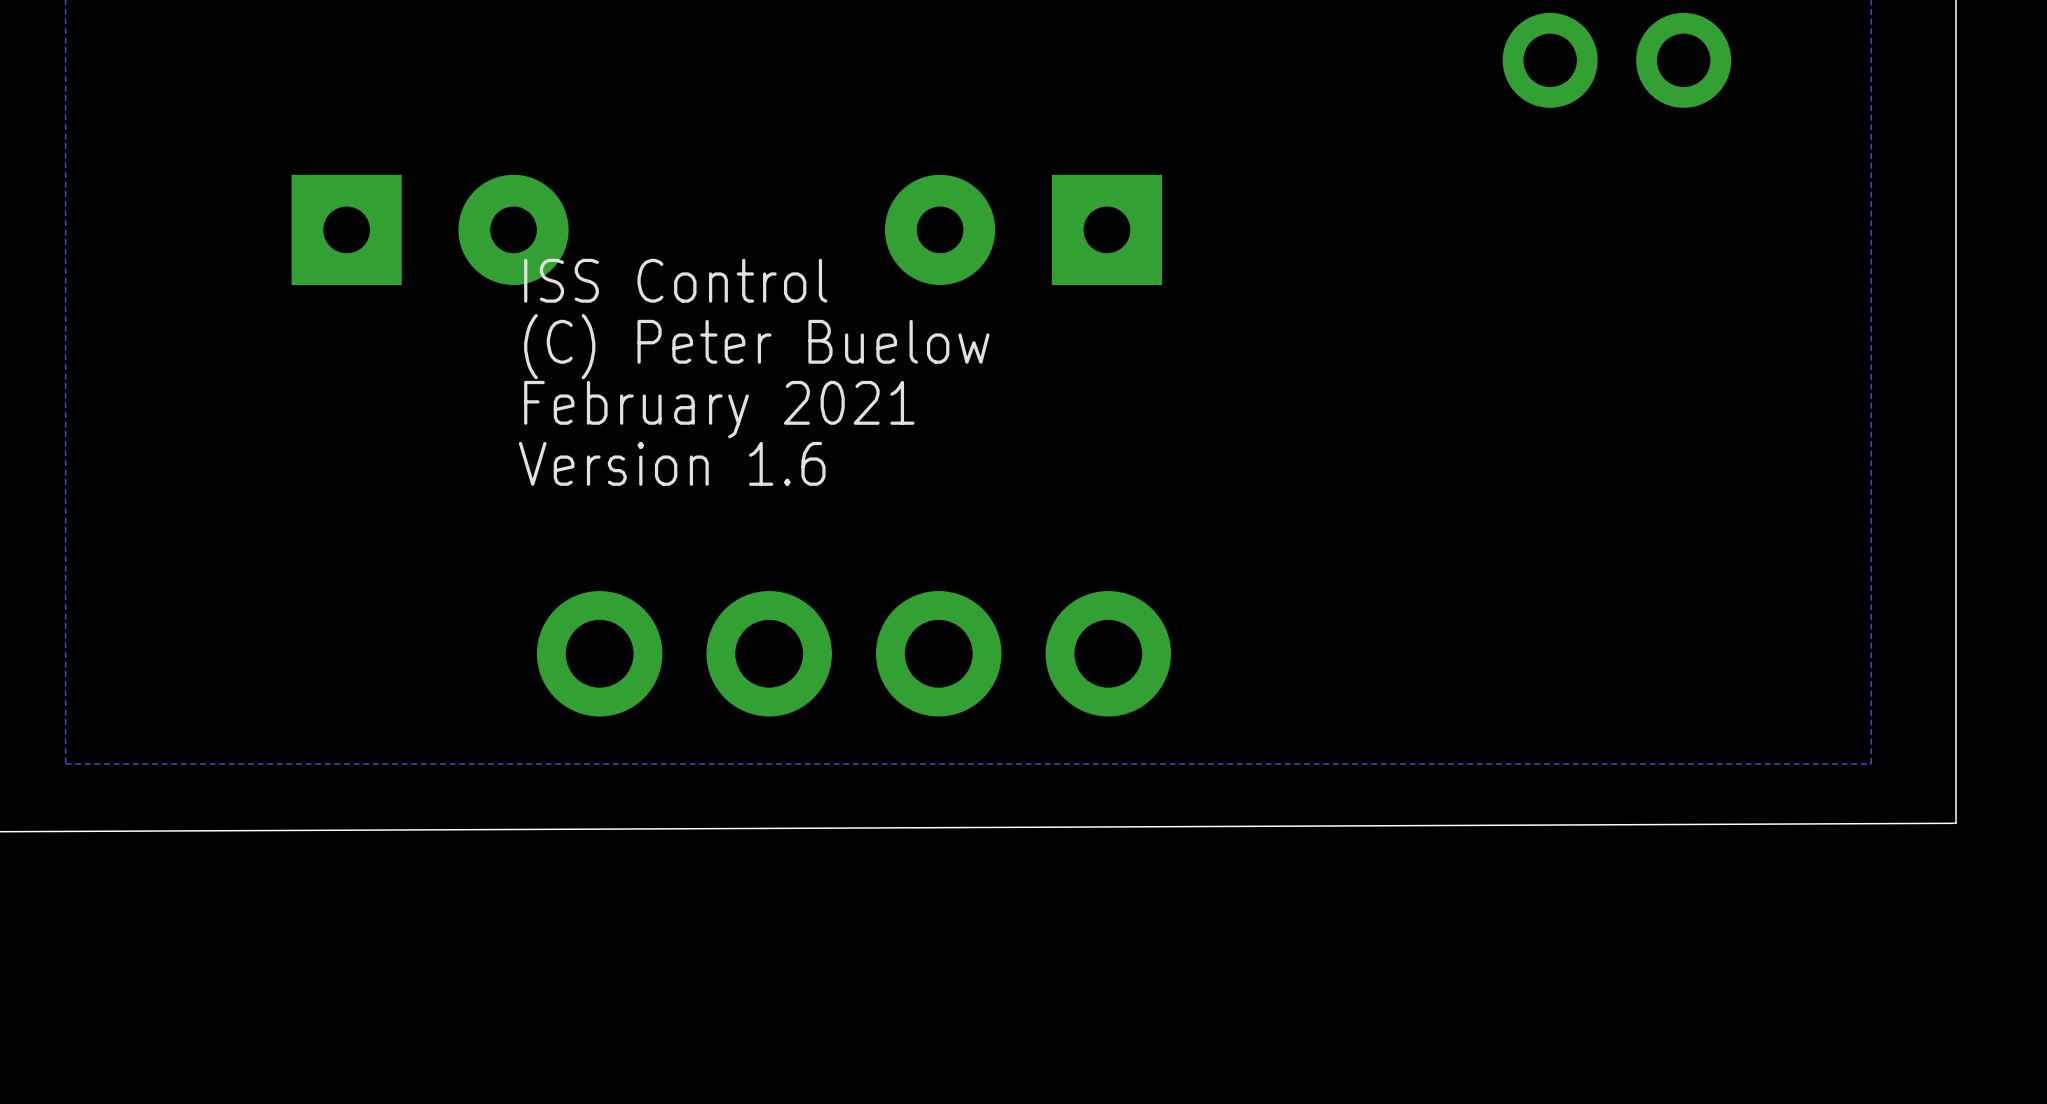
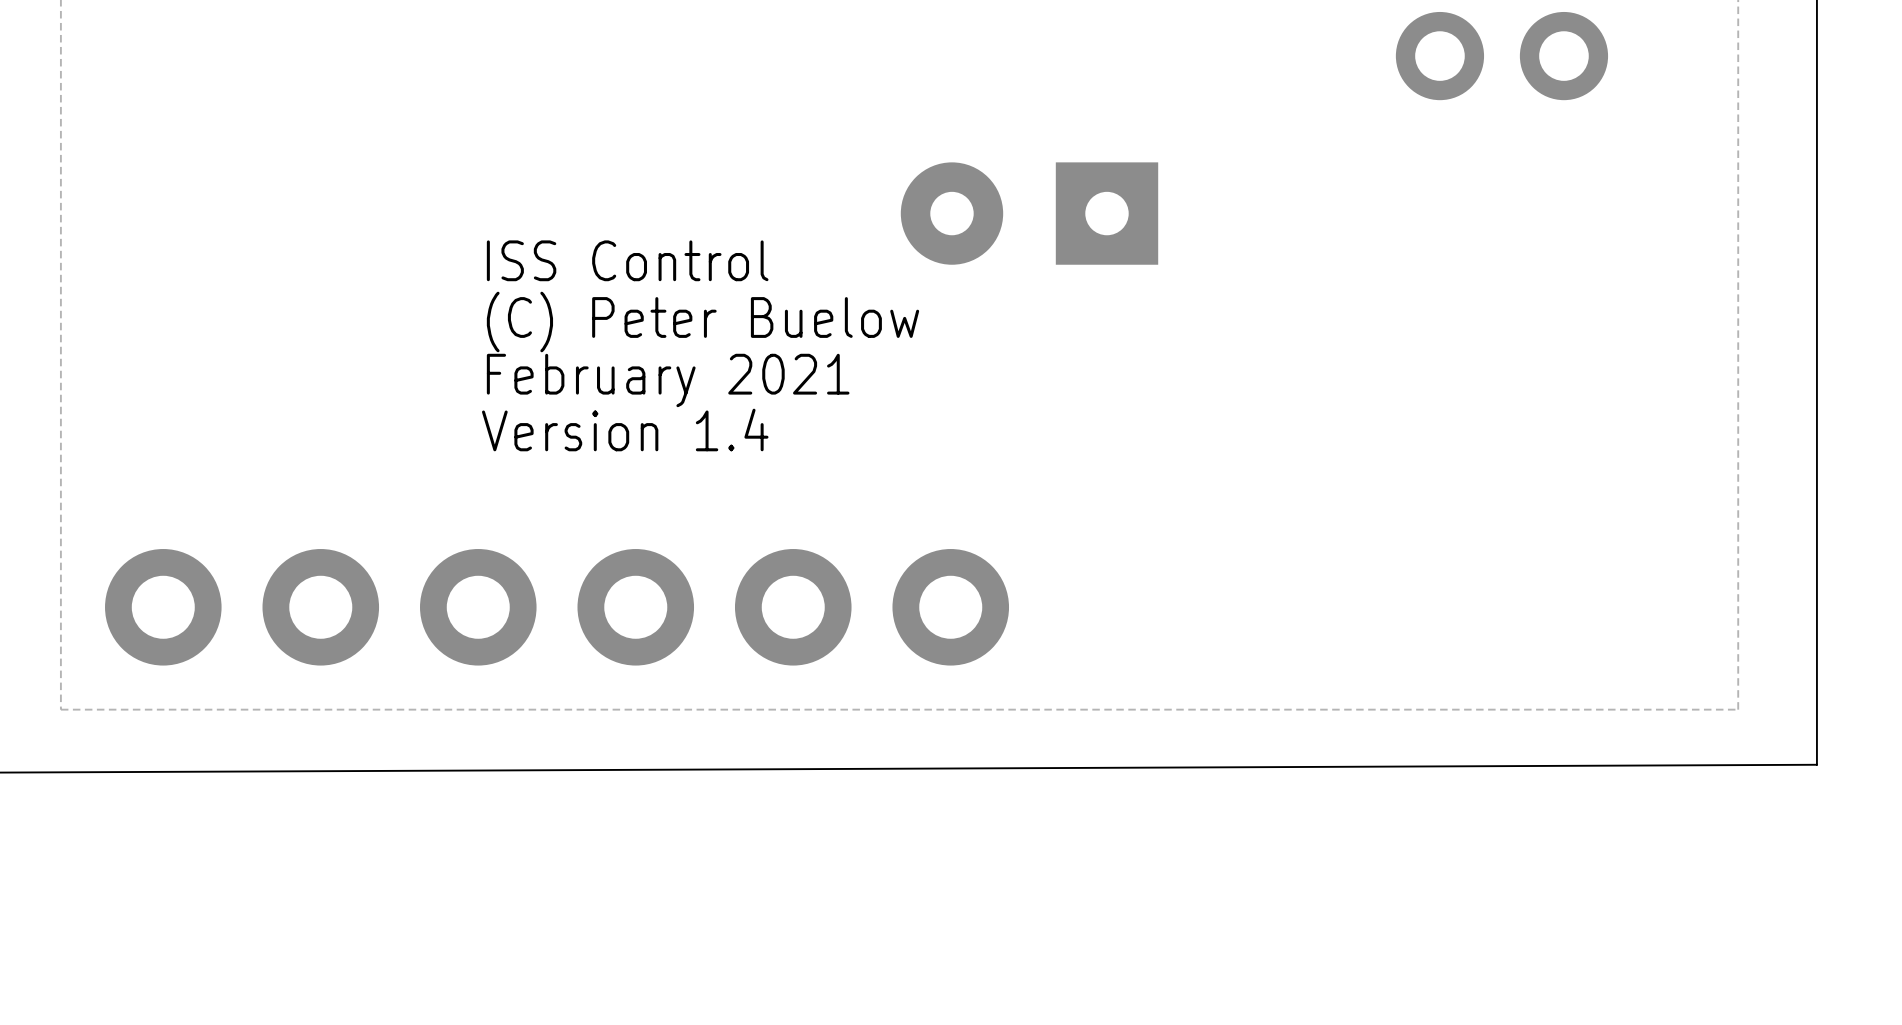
part: (430, 229) -> none
part position: (1023, 229) -> (1029, 213)
text: Version 1.6 (672, 463) -> Version 1.4 (625, 429)
part: none -> (557, 607)
part: (853, 653) -> none

